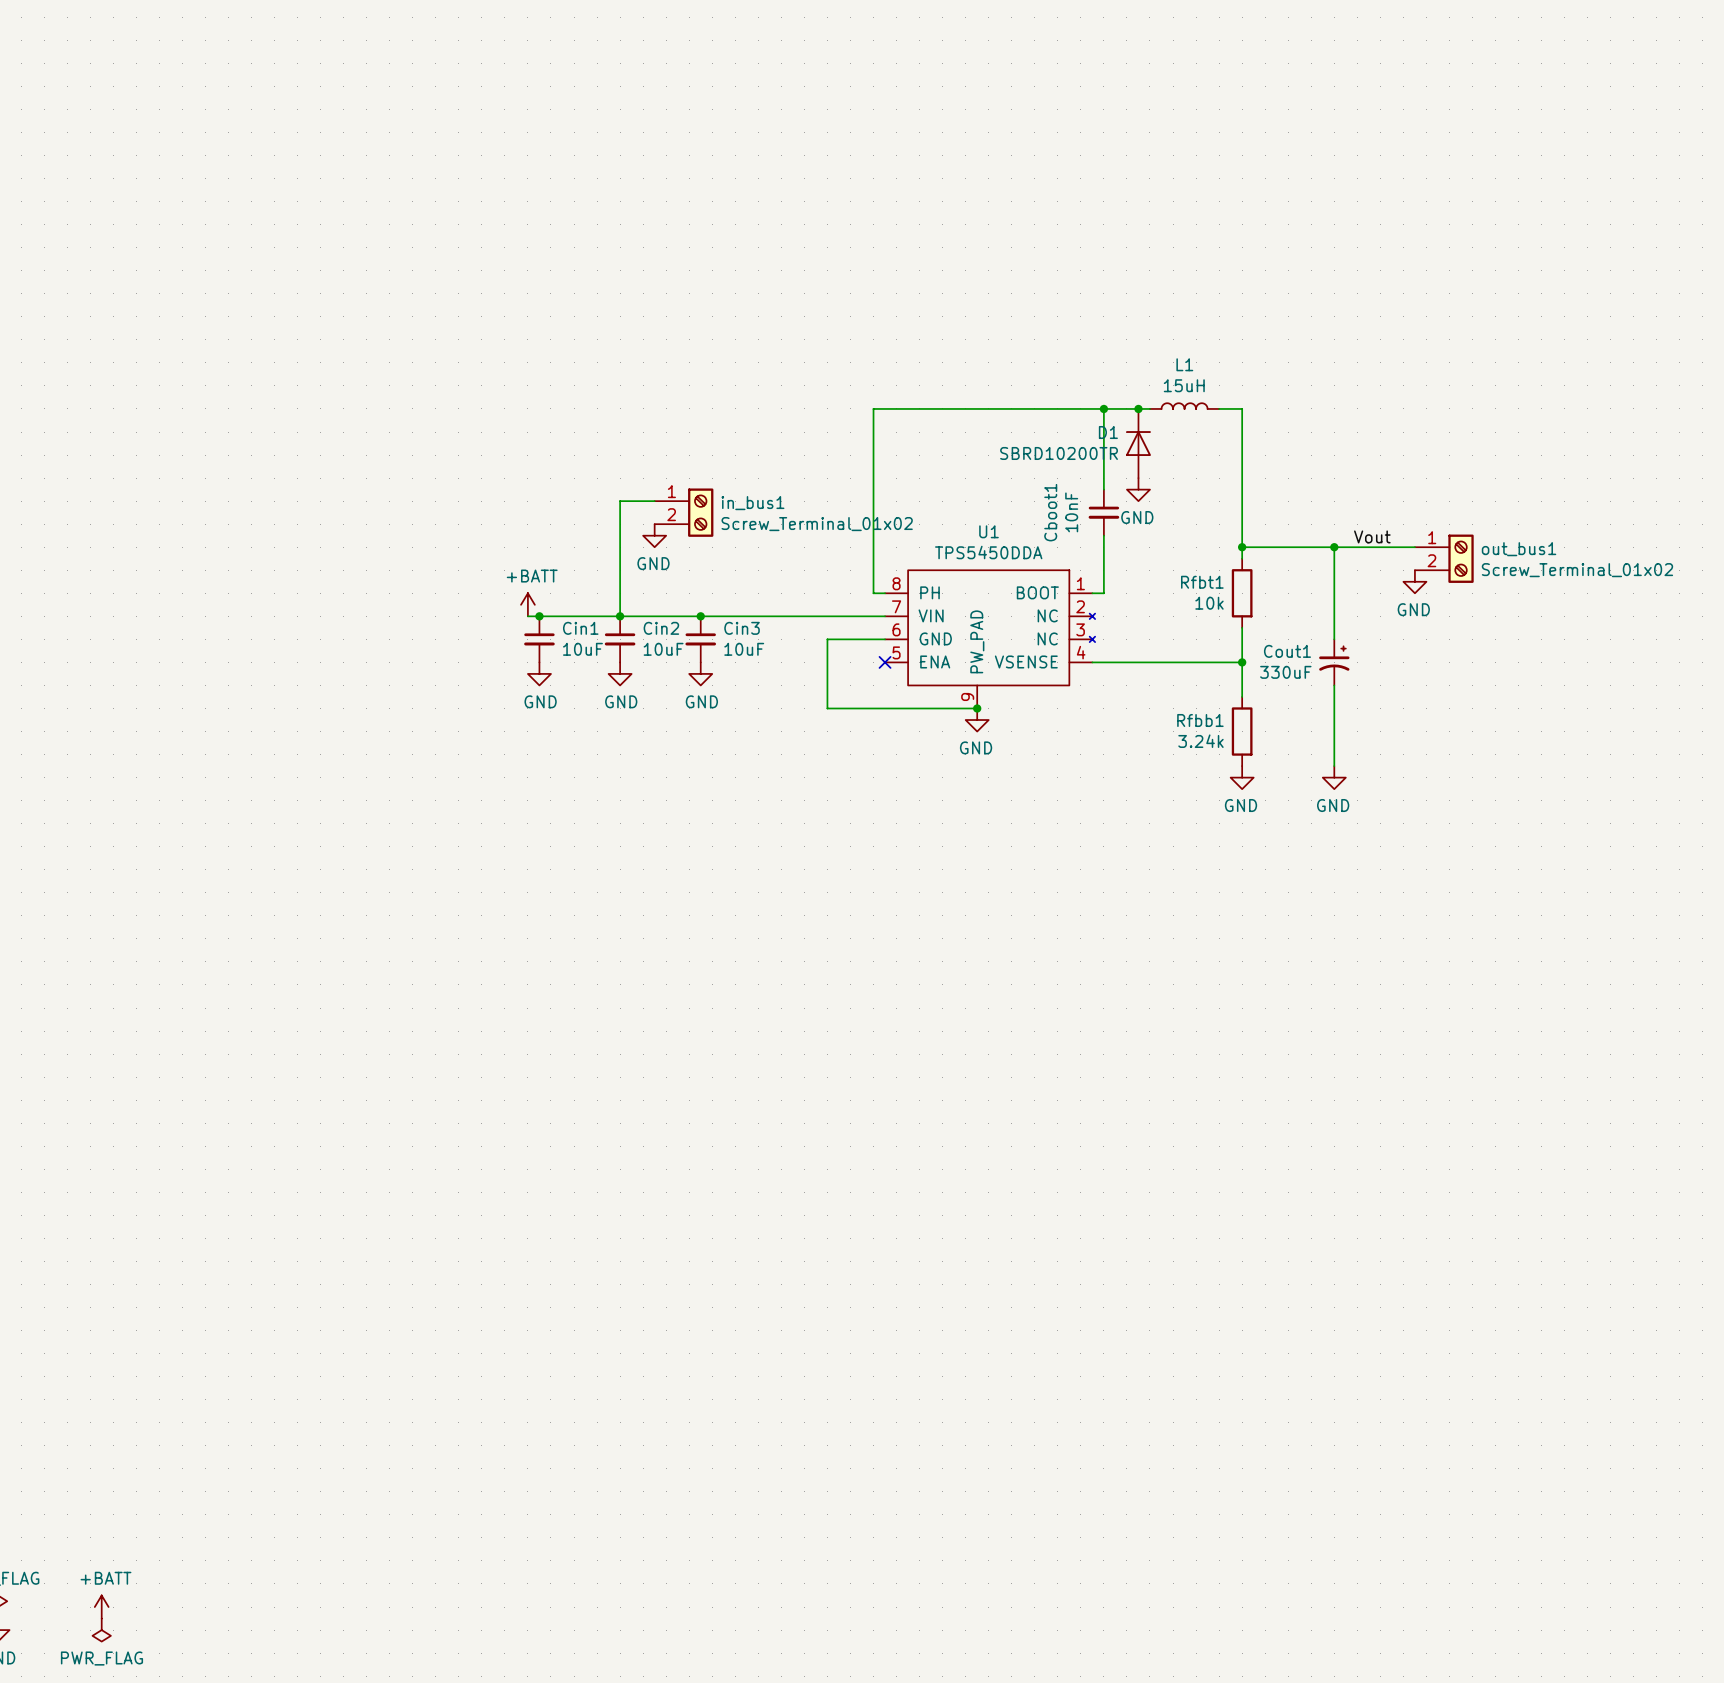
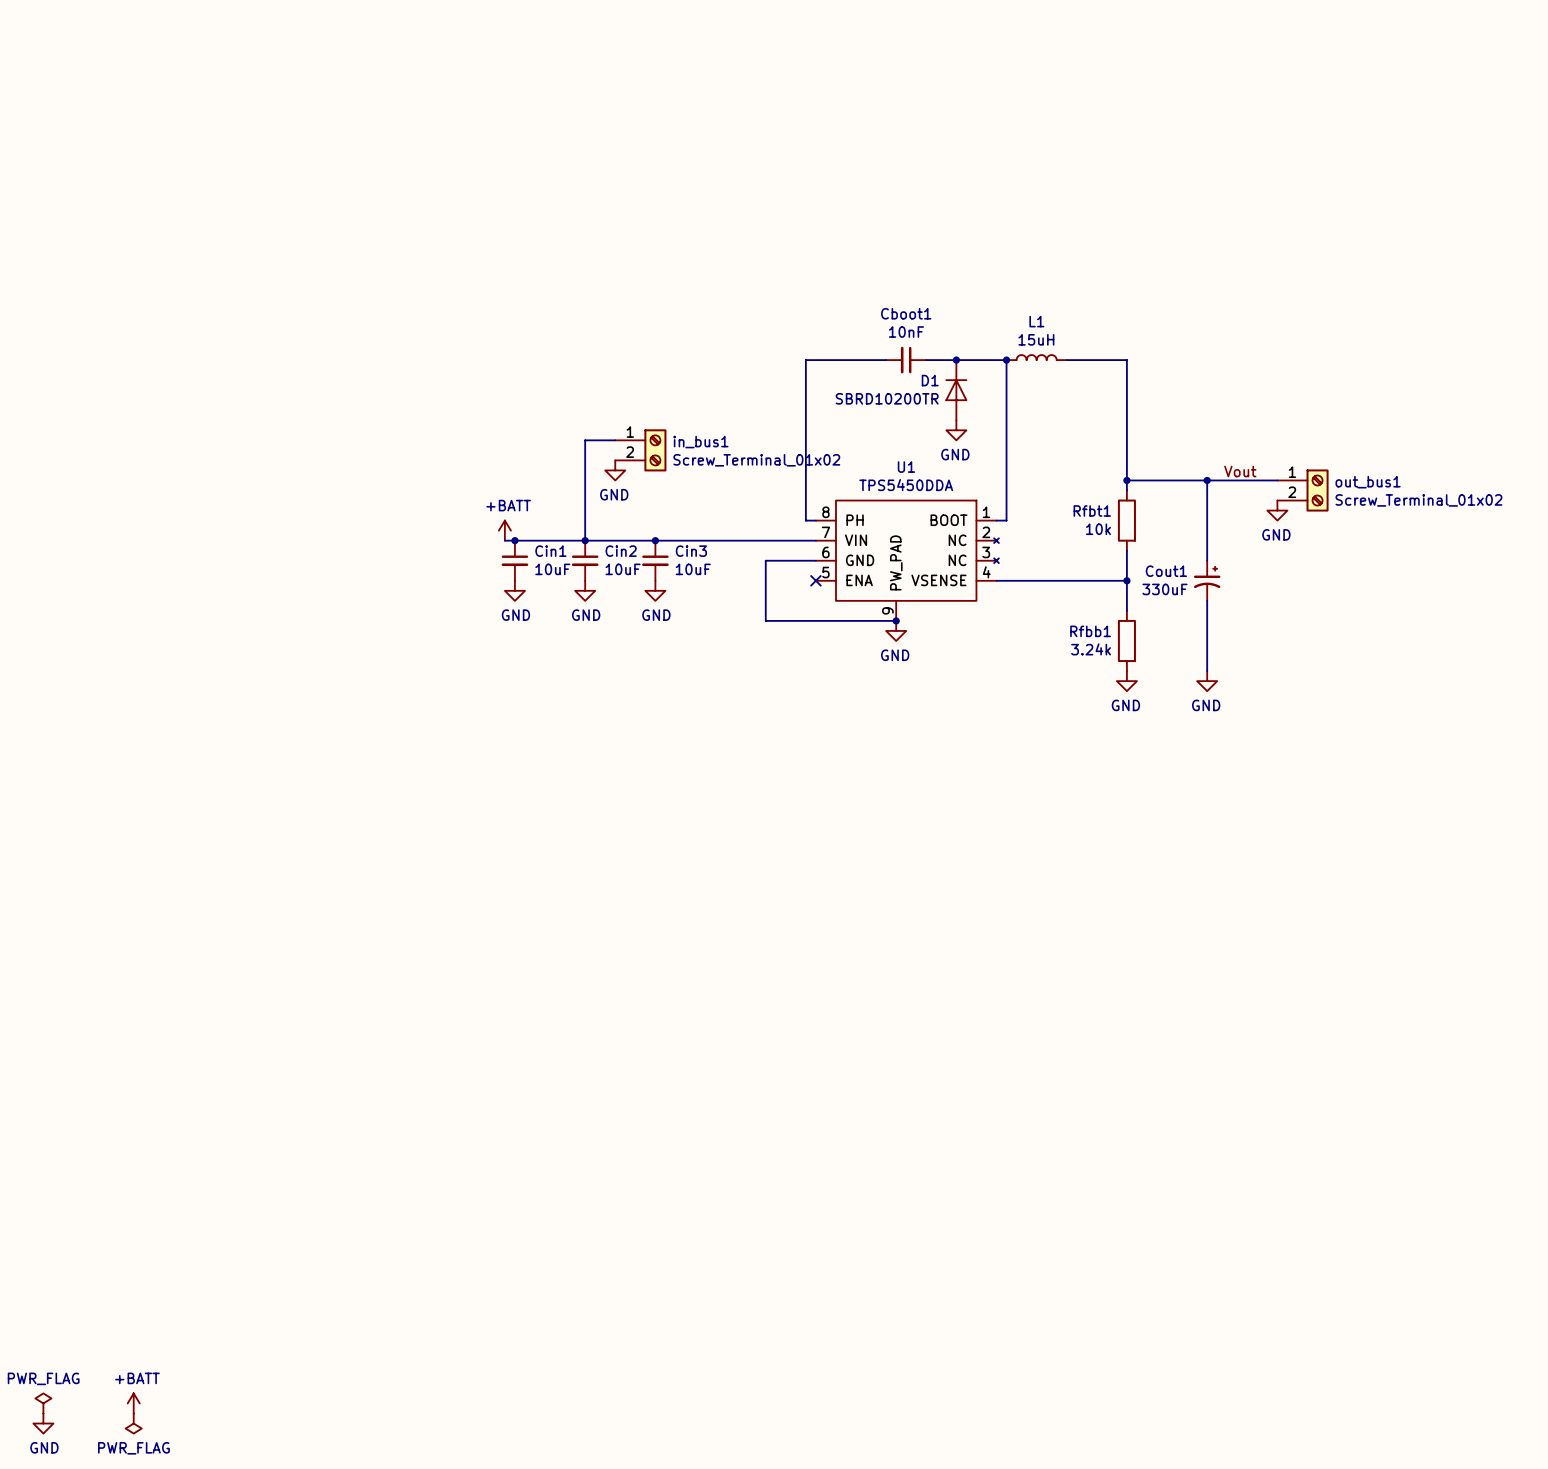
L1 position: (1184, 406) -> (1036, 357)
junction: none -> (956, 360)
wire: (1103, 408) (1149, 408) -> (1066, 360) (1106, 360)
junction: (1138, 408) -> none
D1 position: (1138, 443) -> (956, 390)
power symbol position: GND (1138, 489) -> GND (956, 430)
Cboot1 rotation: 0° (1103, 512) -> 90° clockwise (906, 360)
Cboot1 position: (1103, 512) -> (906, 360)

